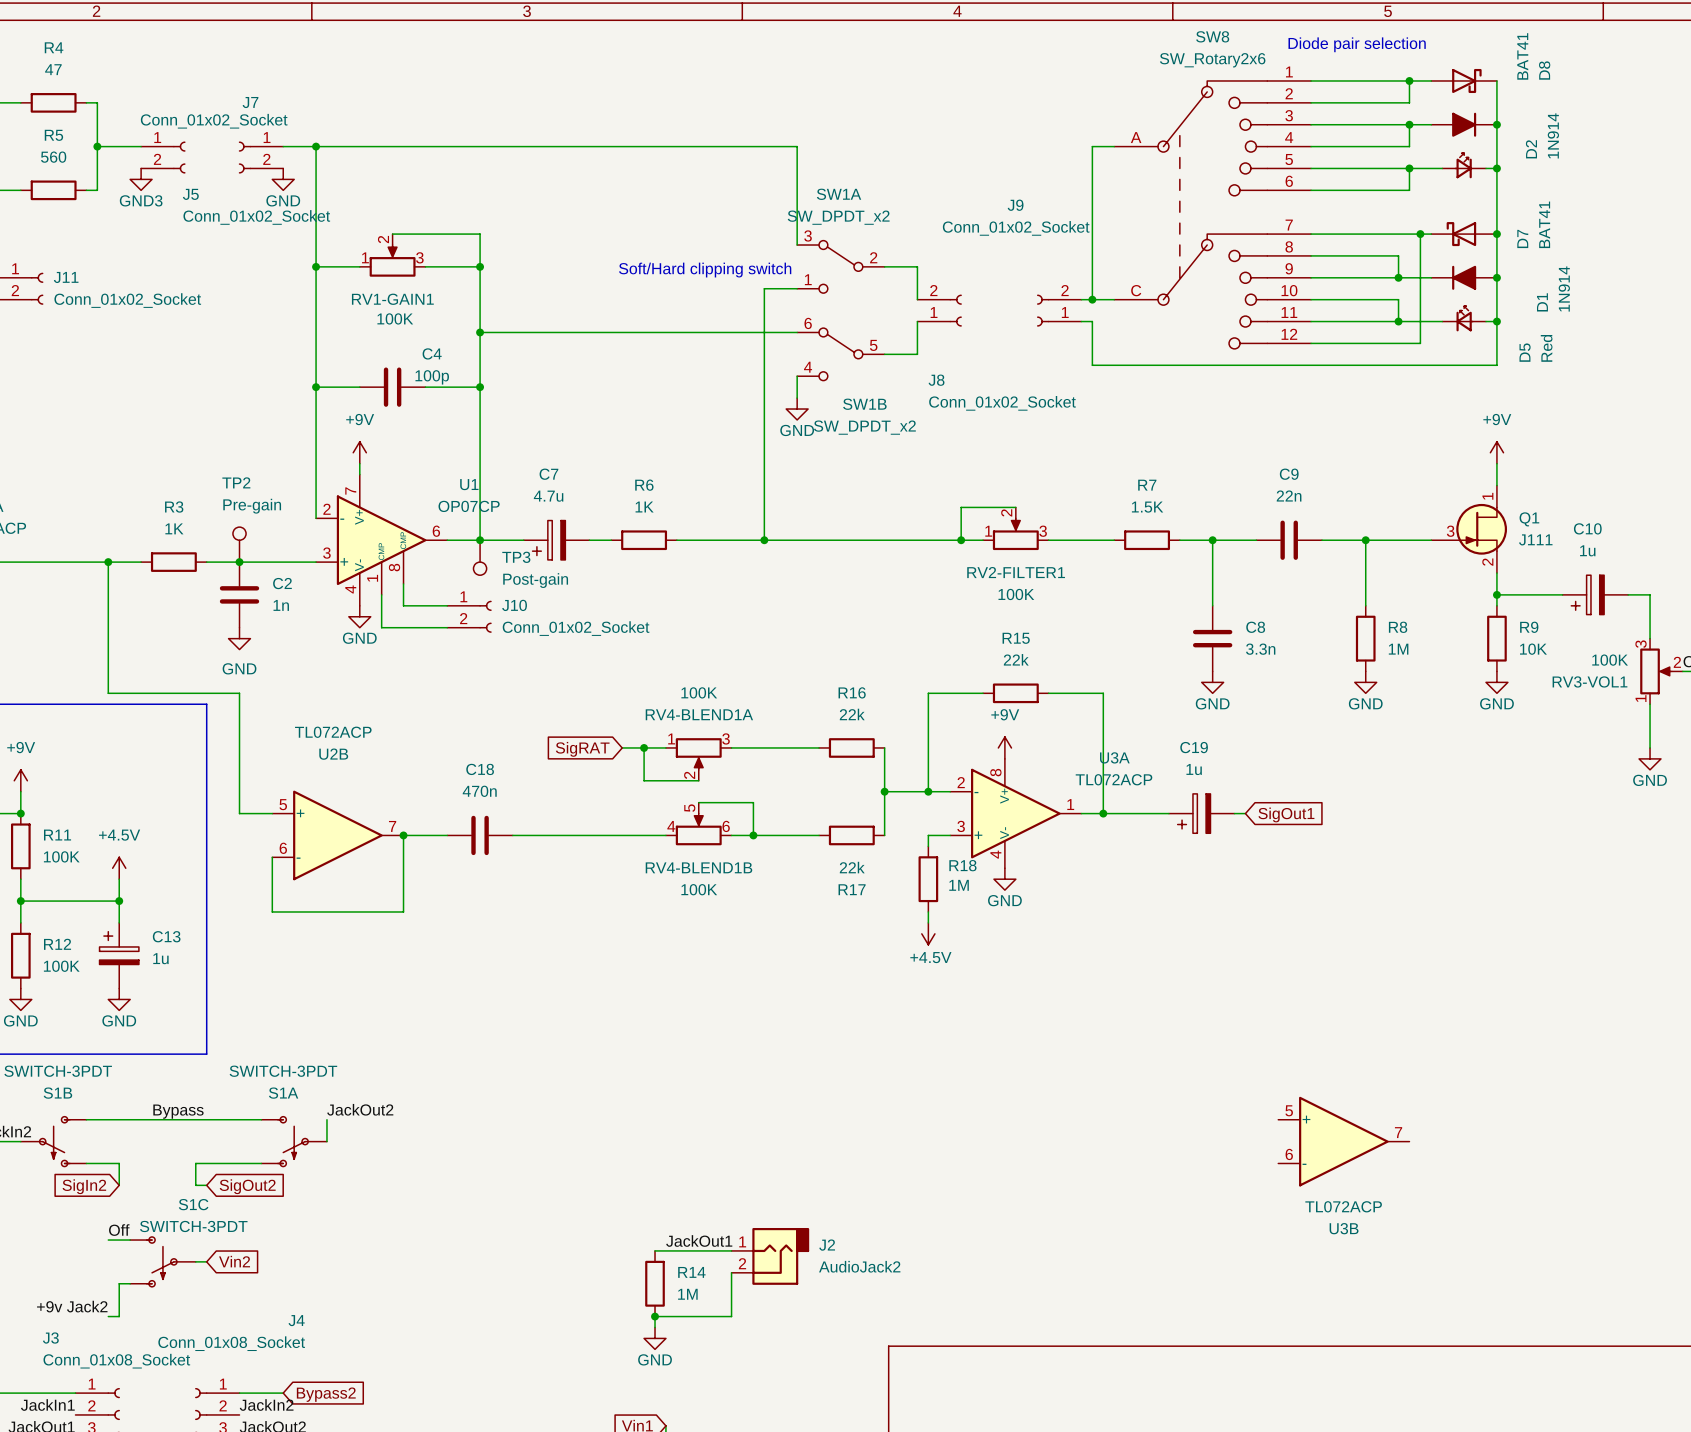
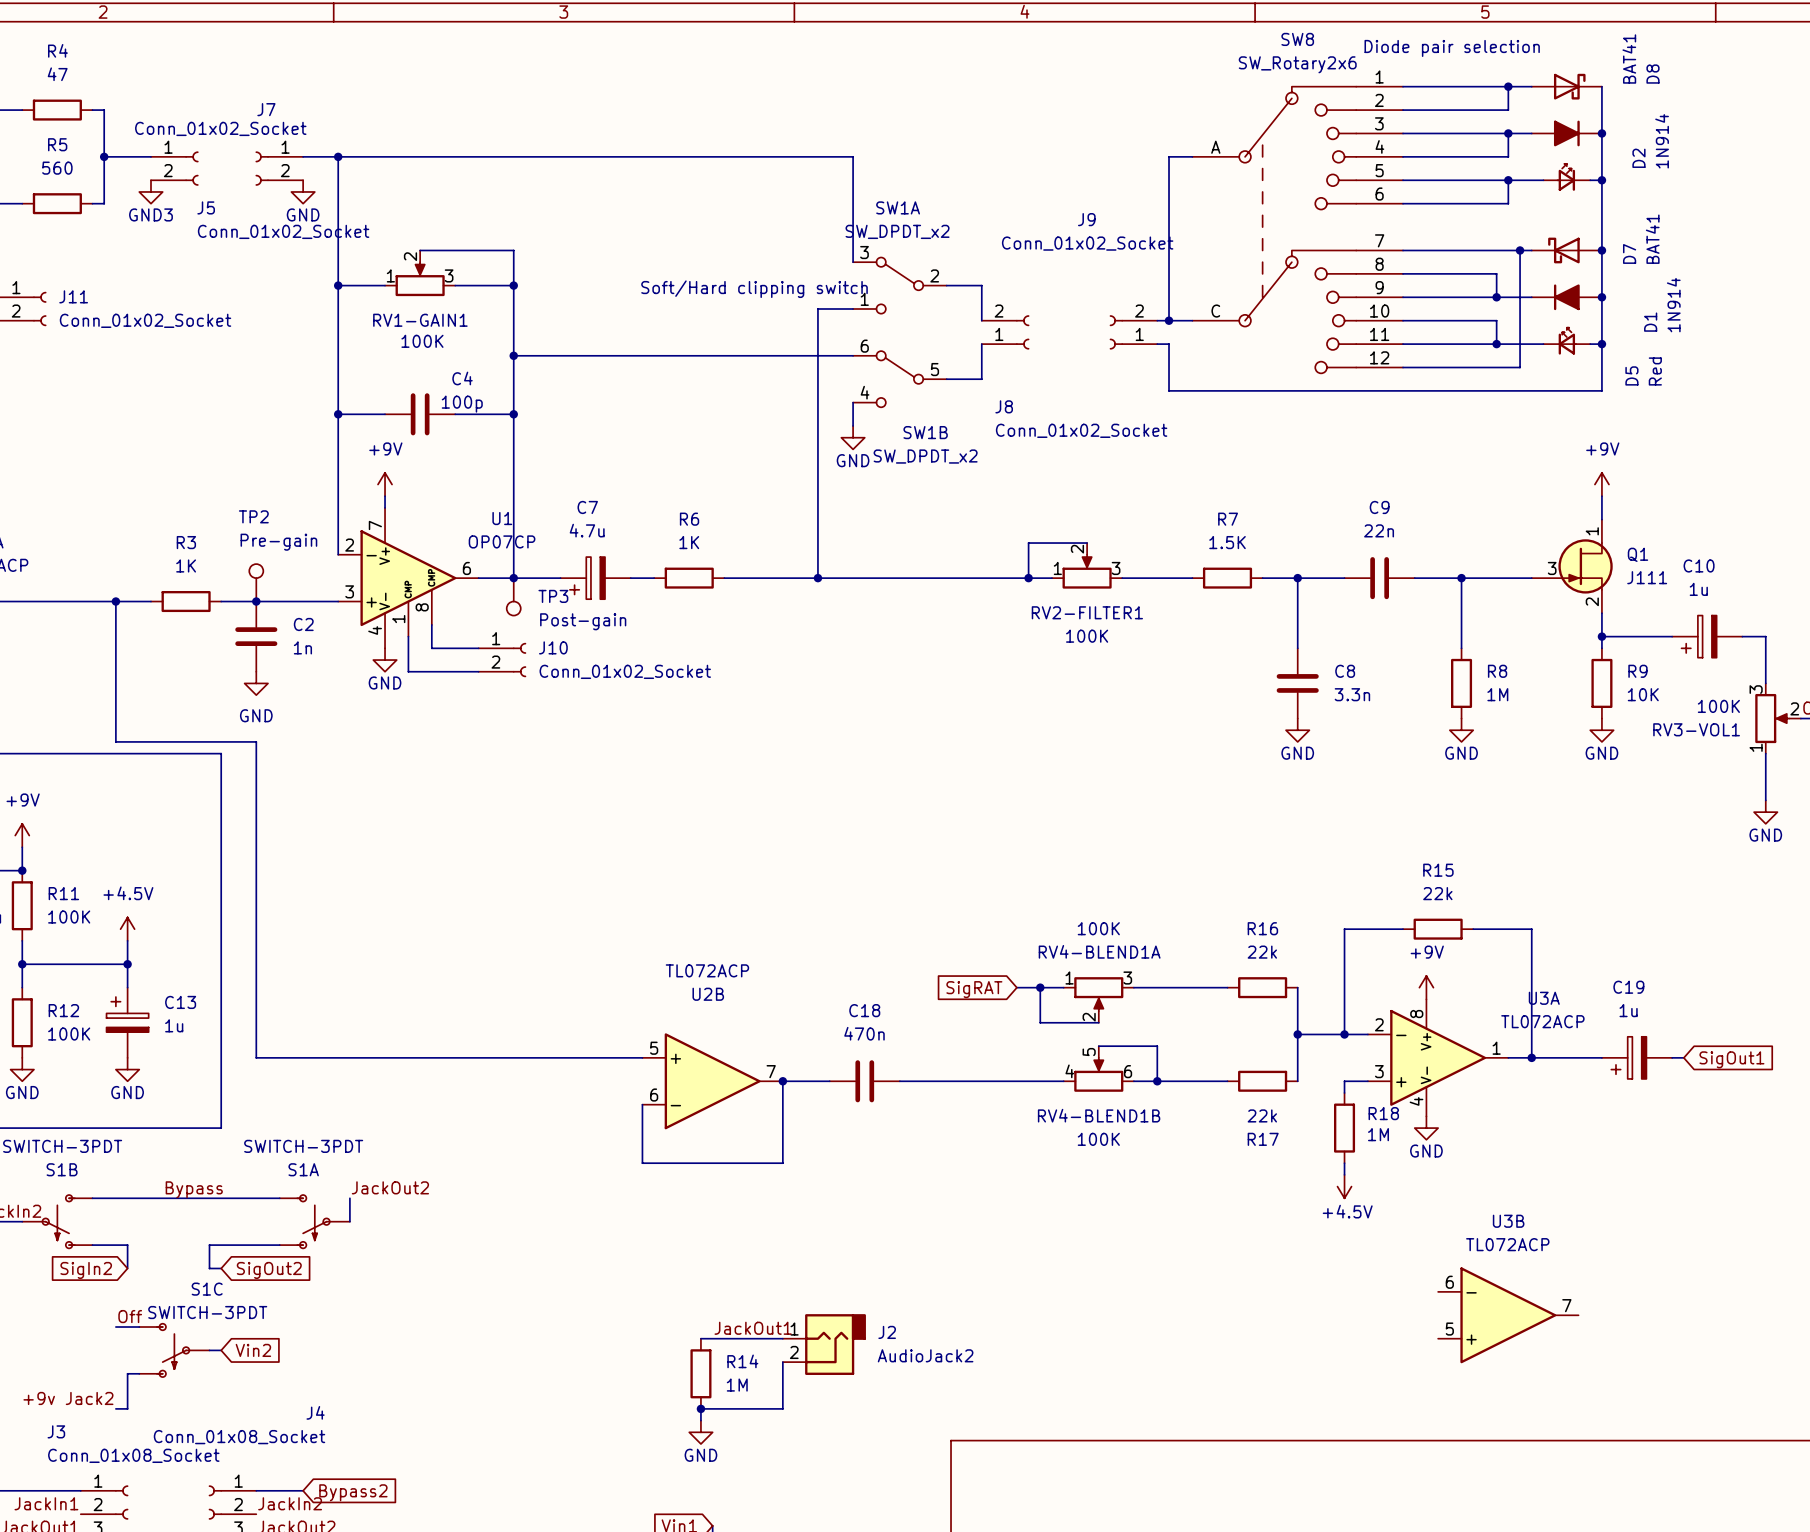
wire: (983, 693) (928, 693) (928, 791) -> none
R15 position: (1015, 693) -> (1438, 929)
wire: (1048, 693) (1103, 693) (1103, 813) -> none
wire: (622, 747) (665, 747) -> none
wire: (644, 747) (644, 780) (698, 780) -> none
junction: (644, 747) -> none
wire: (731, 747) (819, 747) -> none
R16 position: (851, 747) -> (1262, 987)
wire: (884, 747) (884, 835) -> none
power symbol: +9V (1004, 747) -> none
global label: SigRAT (582, 749) -> none
RV4-BLEND1A position: (698, 759) -> (1098, 999)
wire: (884, 791) (950, 791) -> none
junction: (884, 791) -> none
junction: (928, 791) -> none
wire: (698, 802) (753, 802) (753, 835) -> none
wire: (239, 813) (272, 813) -> (256, 870) (256, 1057) (642, 1057)
U3A position: (1015, 813) -> (1438, 1057)
wire: (1081, 813) (1168, 813) -> (1133, 987) (1227, 987)
junction: (1103, 813) -> none
C19 position: (1201, 813) -> (1637, 1057)
wire: (1234, 813) (1245, 813) -> none
global label: SigOut1 (1286, 814) -> none
RV4-BLEND1B position: (698, 823) -> (1098, 1068)
U2B position: (337, 835) -> (712, 1081)
junction: (403, 835) -> none
wire: (447, 835) (403, 835) (403, 911) (272, 911) (272, 857) -> none
C18 position: (480, 835) -> (864, 1081)
wire: (512, 835) (665, 835) -> none
wire: (731, 835) (819, 835) -> none
junction: (753, 835) -> none
R17 position: (851, 835) -> (1262, 1081)
wire: (950, 835) (928, 835) (928, 846) -> none
wire: none -> (1403, 929) (1344, 929) (1344, 1034)
wire: none -> (1473, 929) (1531, 929) (1531, 1057)
R18 position: (928, 879) -> (1344, 1128)
power symbol: GND (1004, 879) -> none
wire: (928, 911) (928, 922) -> none
wire: none -> (1016, 987) (1063, 987)
wire: none -> (1040, 987) (1040, 1022) (1098, 1022)
junction: none -> (1040, 987)
wire: none -> (1297, 987) (1297, 1081)
power symbol: none -> +9V (1426, 987)
global label: none -> SigRAT (974, 989)
power symbol: +4.5V (928, 933) -> none
wire: none -> (1297, 1034) (1367, 1034)
junction: none -> (1297, 1034)
junction: none -> (1344, 1034)
wire: none -> (1098, 1046) (1157, 1046) (1157, 1081)
wire: none -> (1508, 1057) (1601, 1057)
junction: none -> (1531, 1057)
wire: none -> (1672, 1057) (1683, 1057)
global label: none -> SigOut1 (1731, 1059)
junction: none -> (782, 1081)
wire: none -> (829, 1081) (782, 1081) (782, 1163) (642, 1163) (642, 1104)
wire: none -> (899, 1081) (1063, 1081)
wire: none -> (1133, 1081) (1227, 1081)
junction: none -> (1157, 1081)
wire: none -> (1367, 1081) (1344, 1081) (1344, 1092)
power symbol: none -> GND (1426, 1128)
wire: none -> (1344, 1163) (1344, 1174)
power symbol: none -> +4.5V (1344, 1186)
U3B flip: as is (1343, 1141) -> up-down (1508, 1315)
U3B position: (1343, 1141) -> (1508, 1315)

